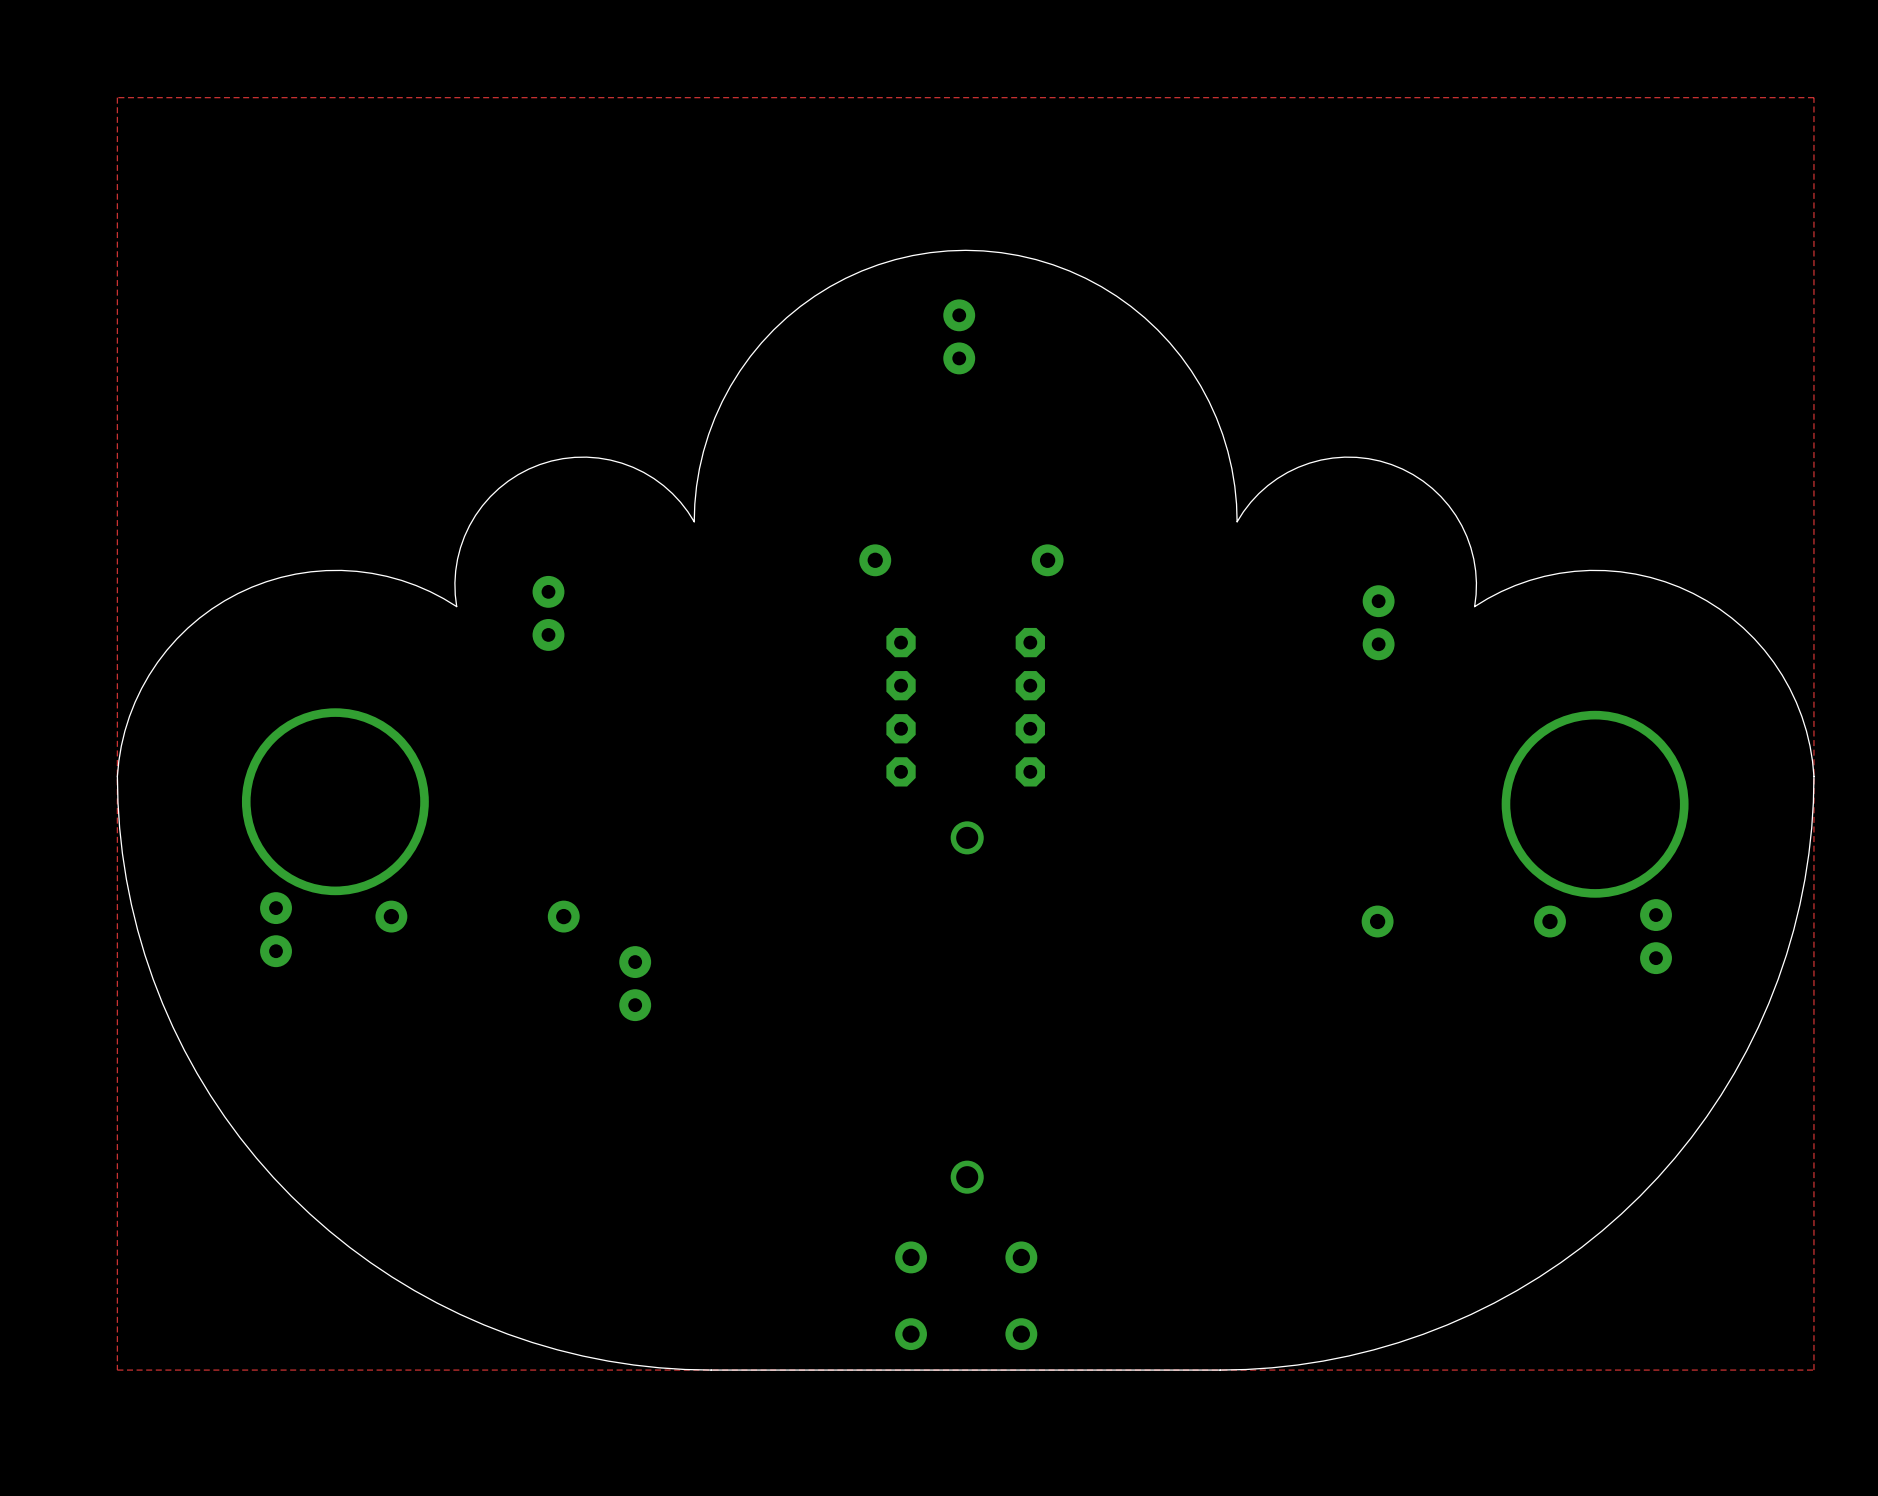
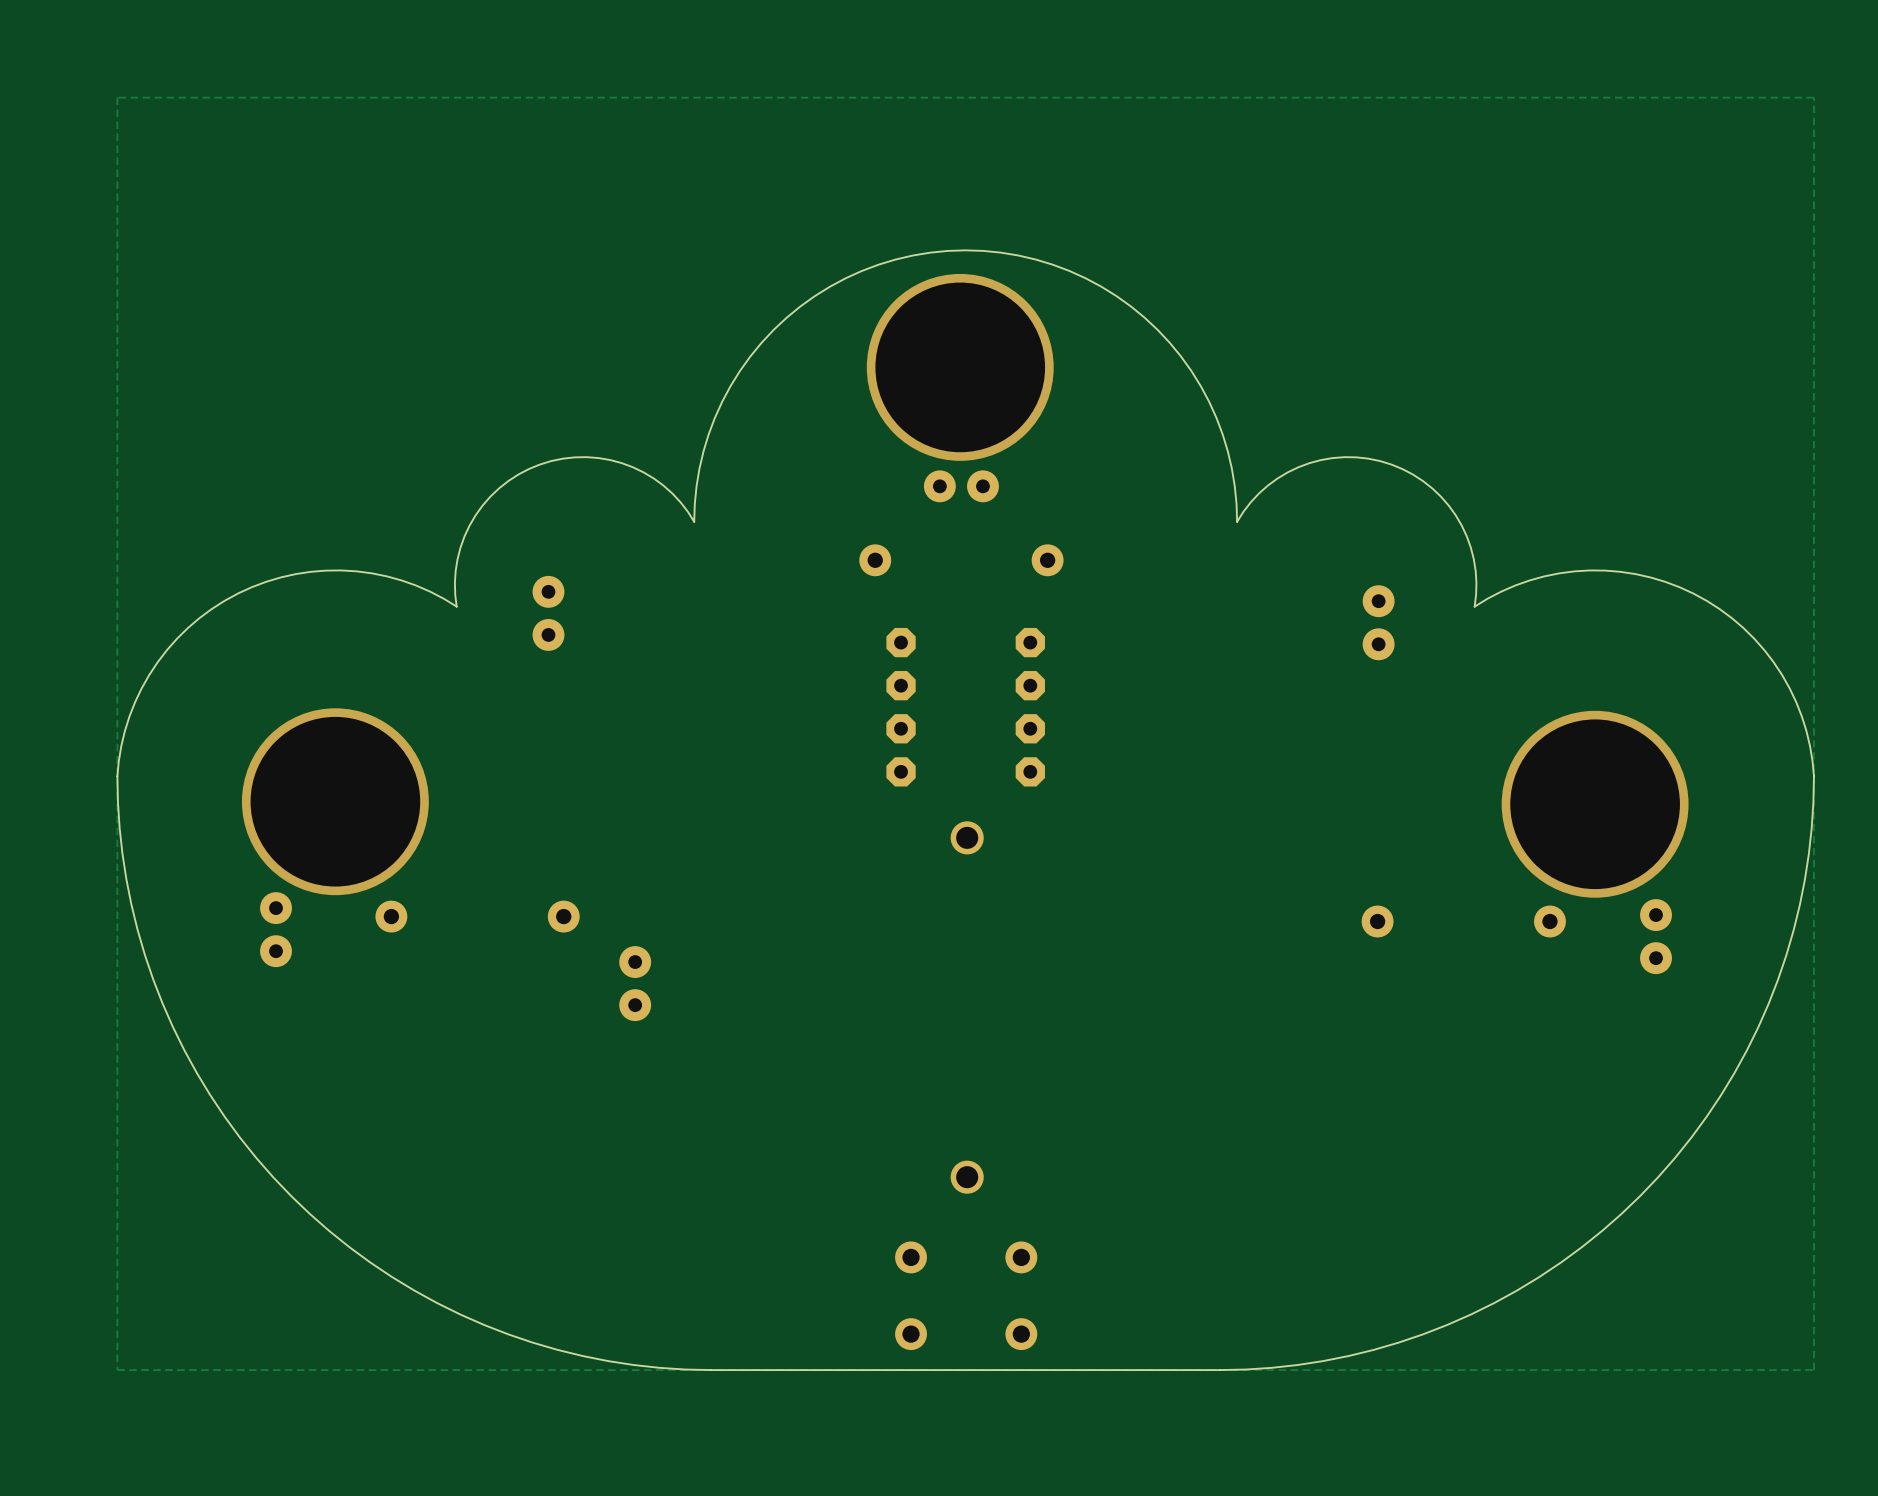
part rotation: 0° (959, 336) -> 90° clockwise (961, 486)
part position: (959, 336) -> (961, 486)
via: none -> (960, 367)

